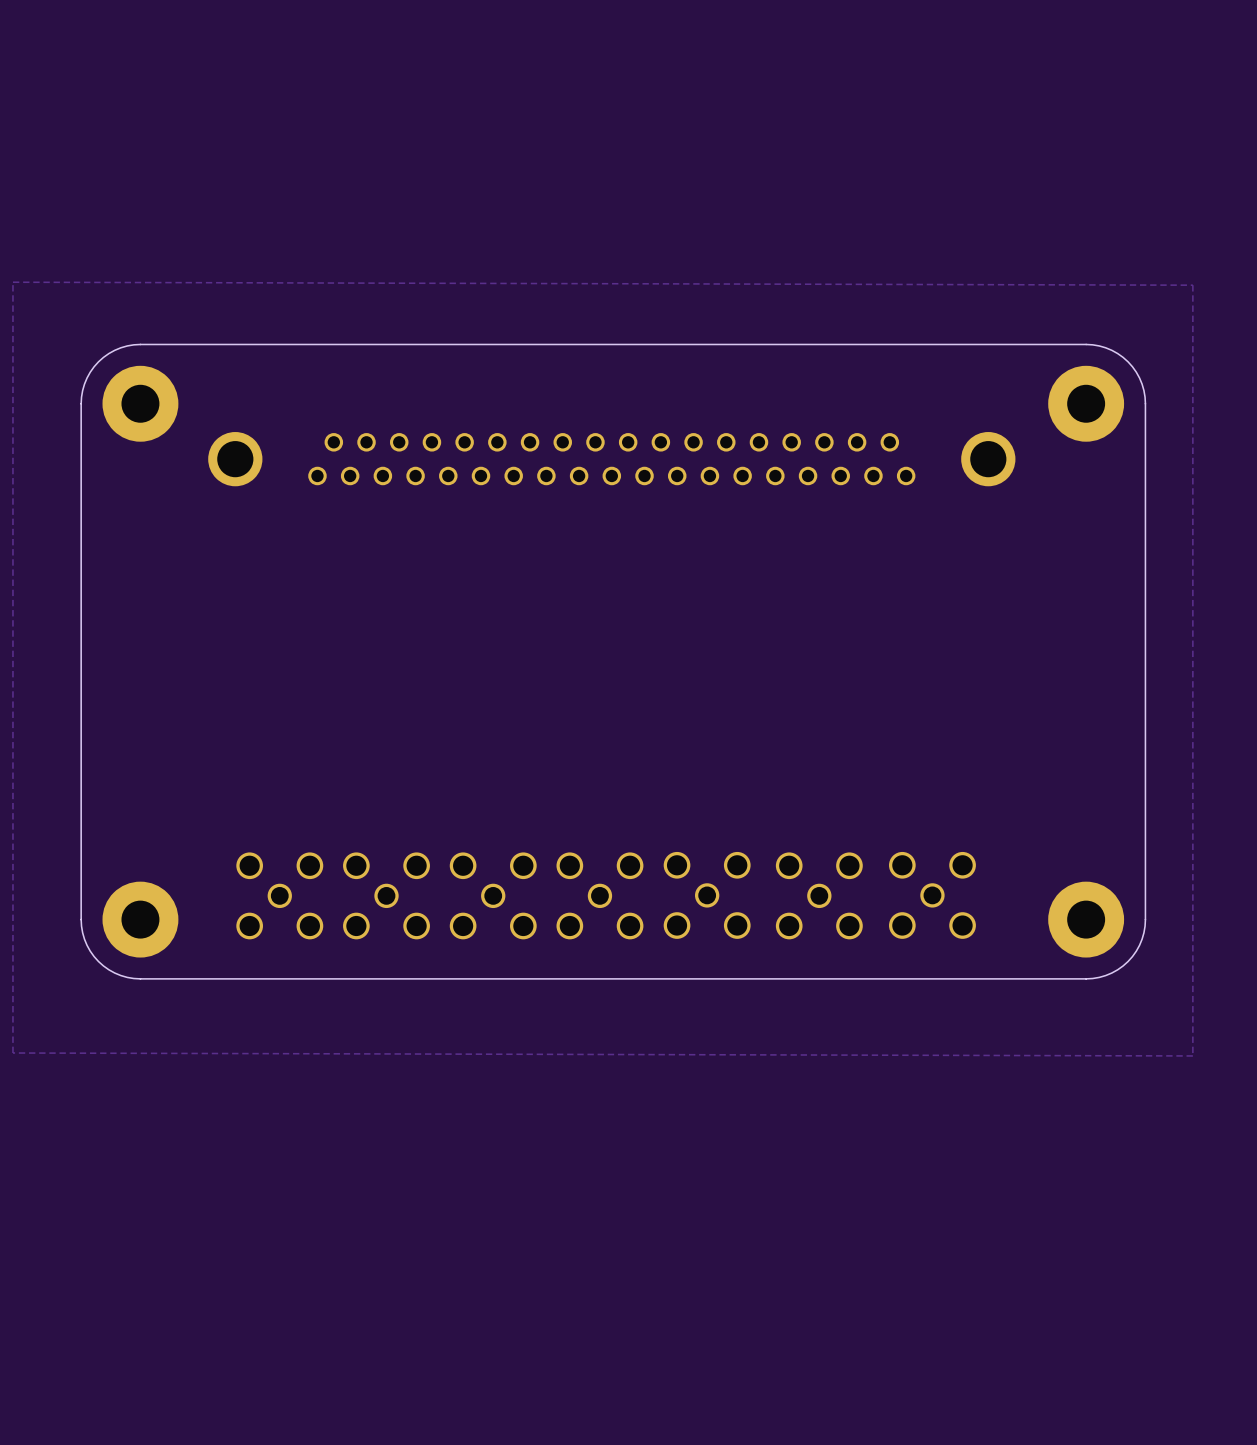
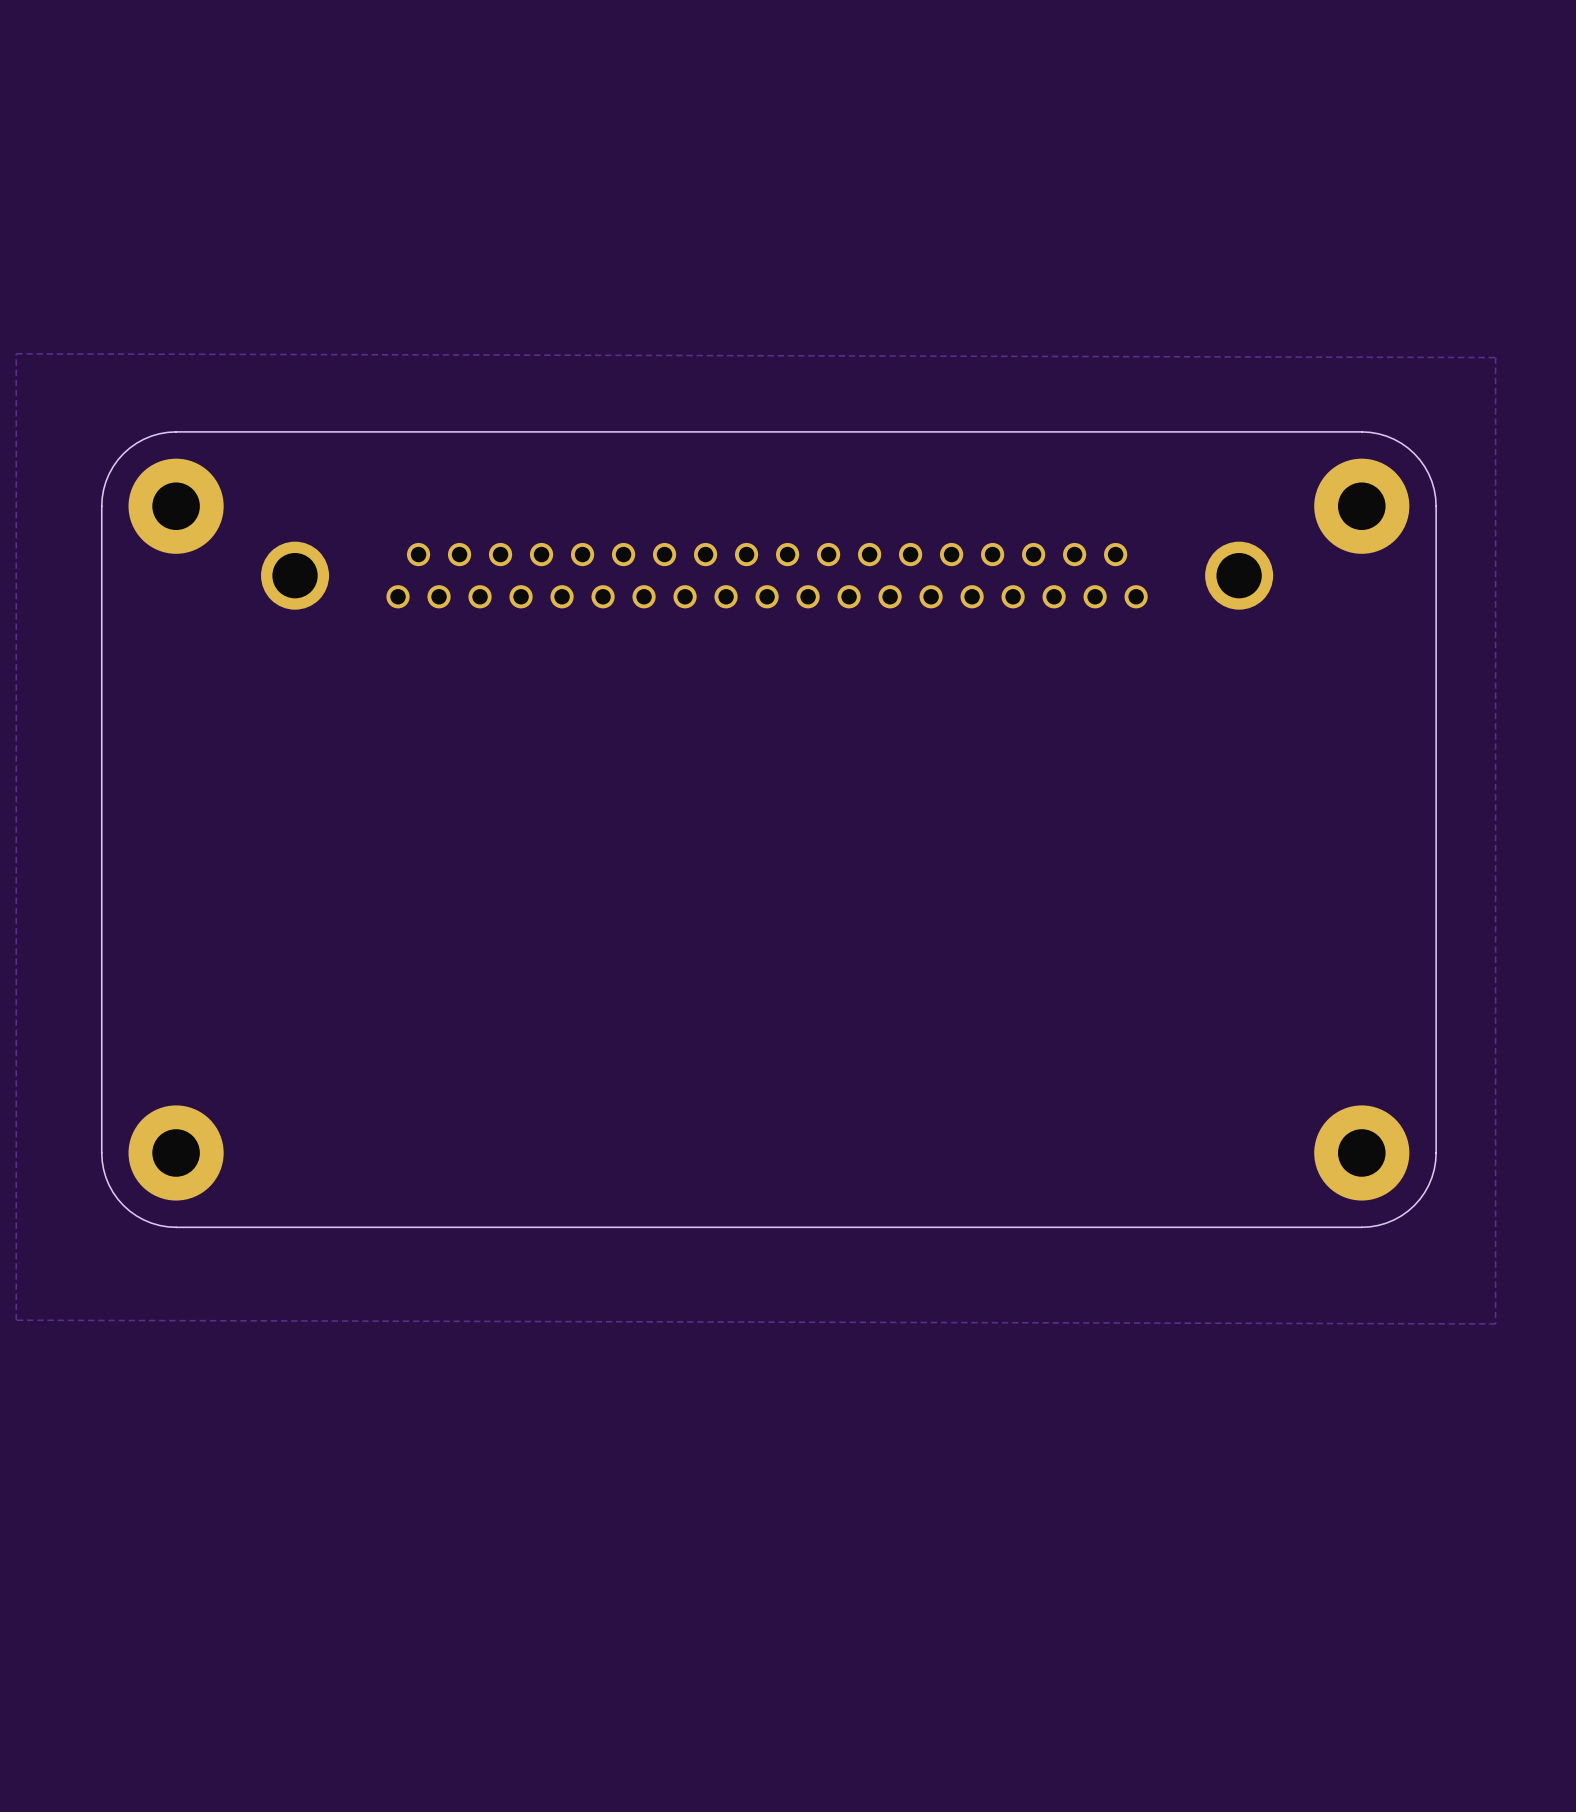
part: (279, 895) -> none
part: (386, 895) -> none
part: (493, 895) -> none
part: (599, 895) -> none
part: (707, 895) -> none
part: (819, 895) -> none
part: (932, 895) -> none

